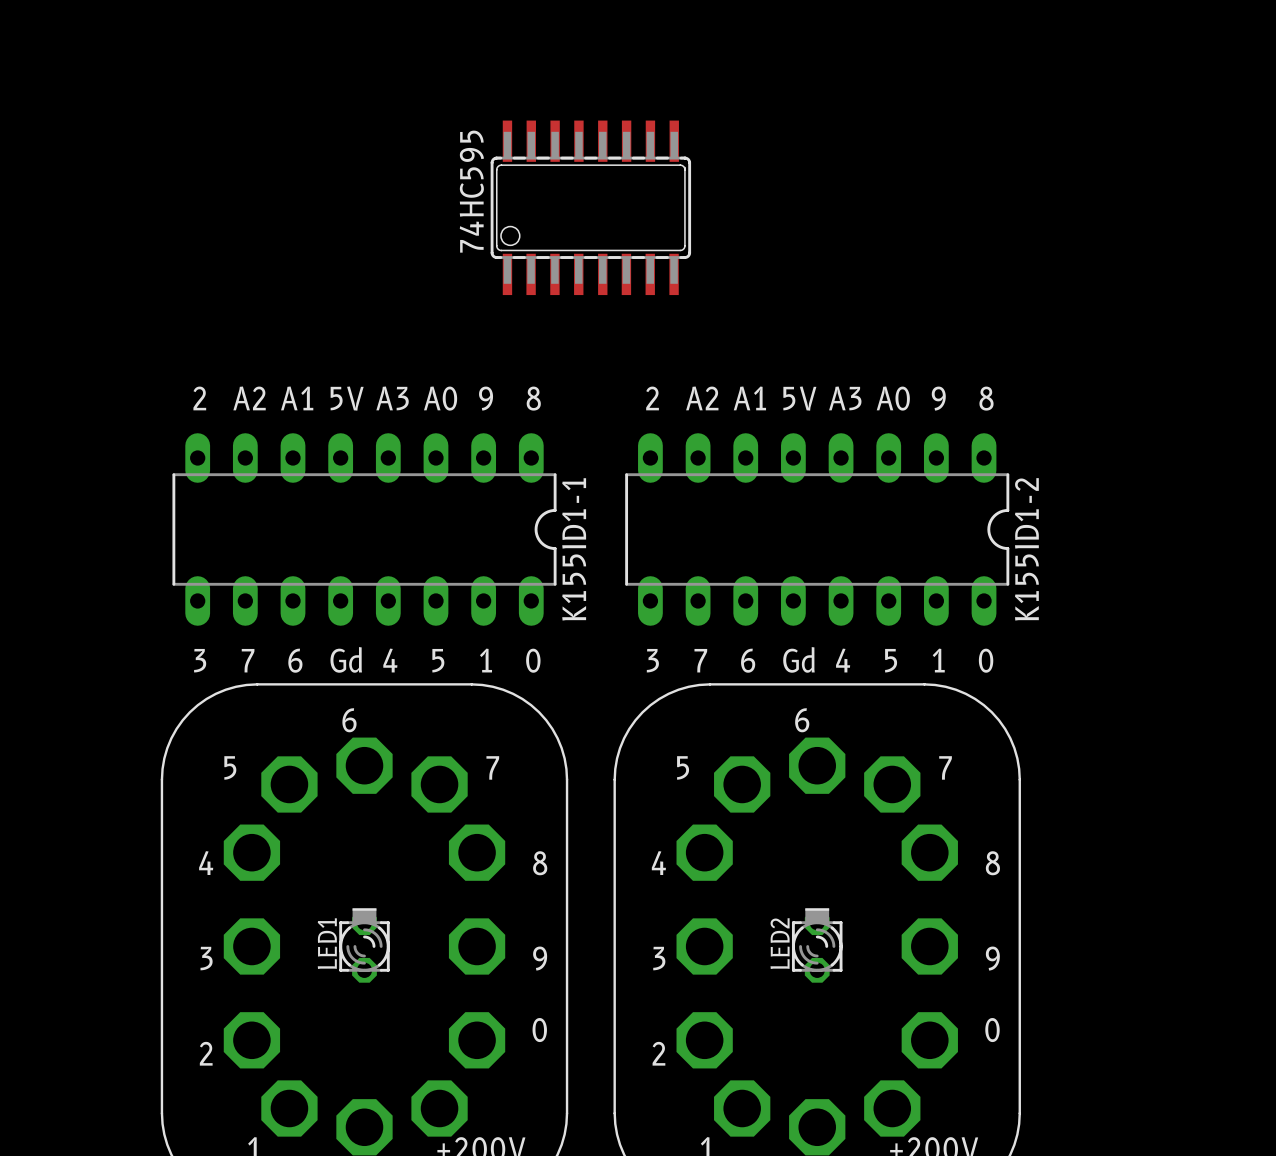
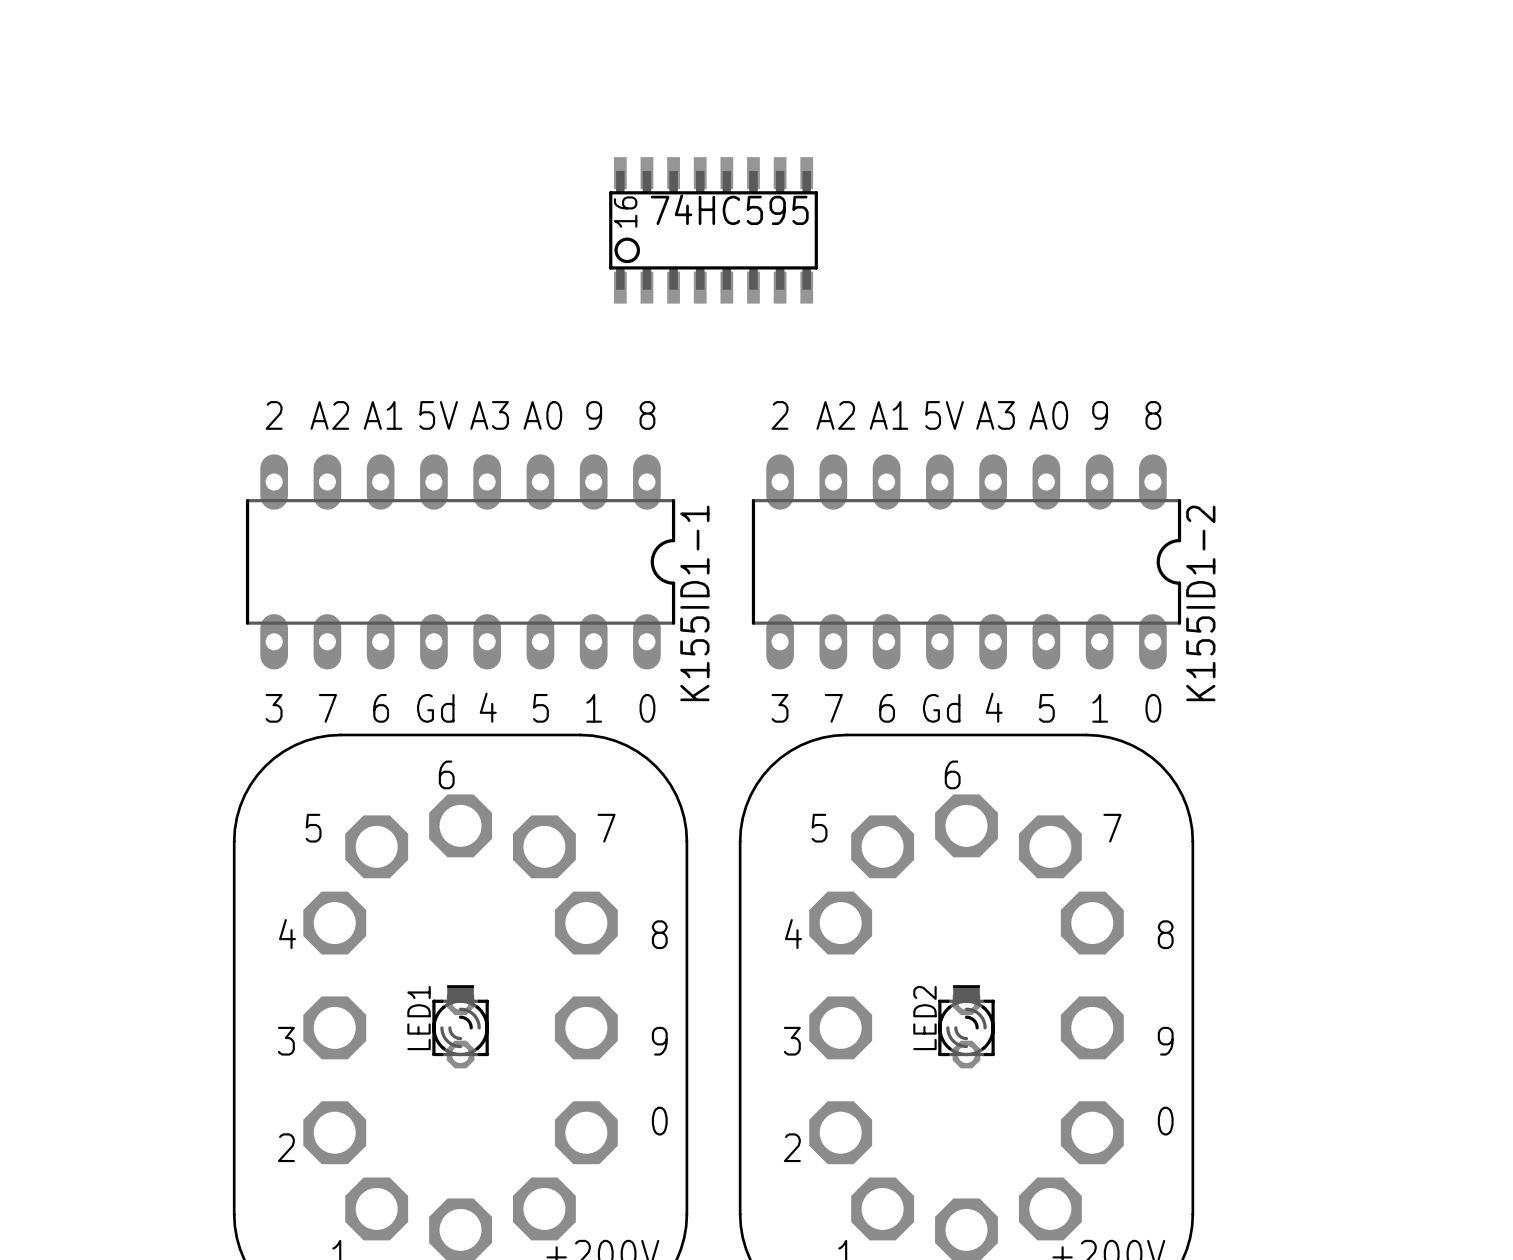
74HC595 footprint: [490, 120, 692, 296] -> [609, 157, 818, 304]
74HC595 name position: 74HC595 (471, 191) -> 74HC595 (729, 209)

